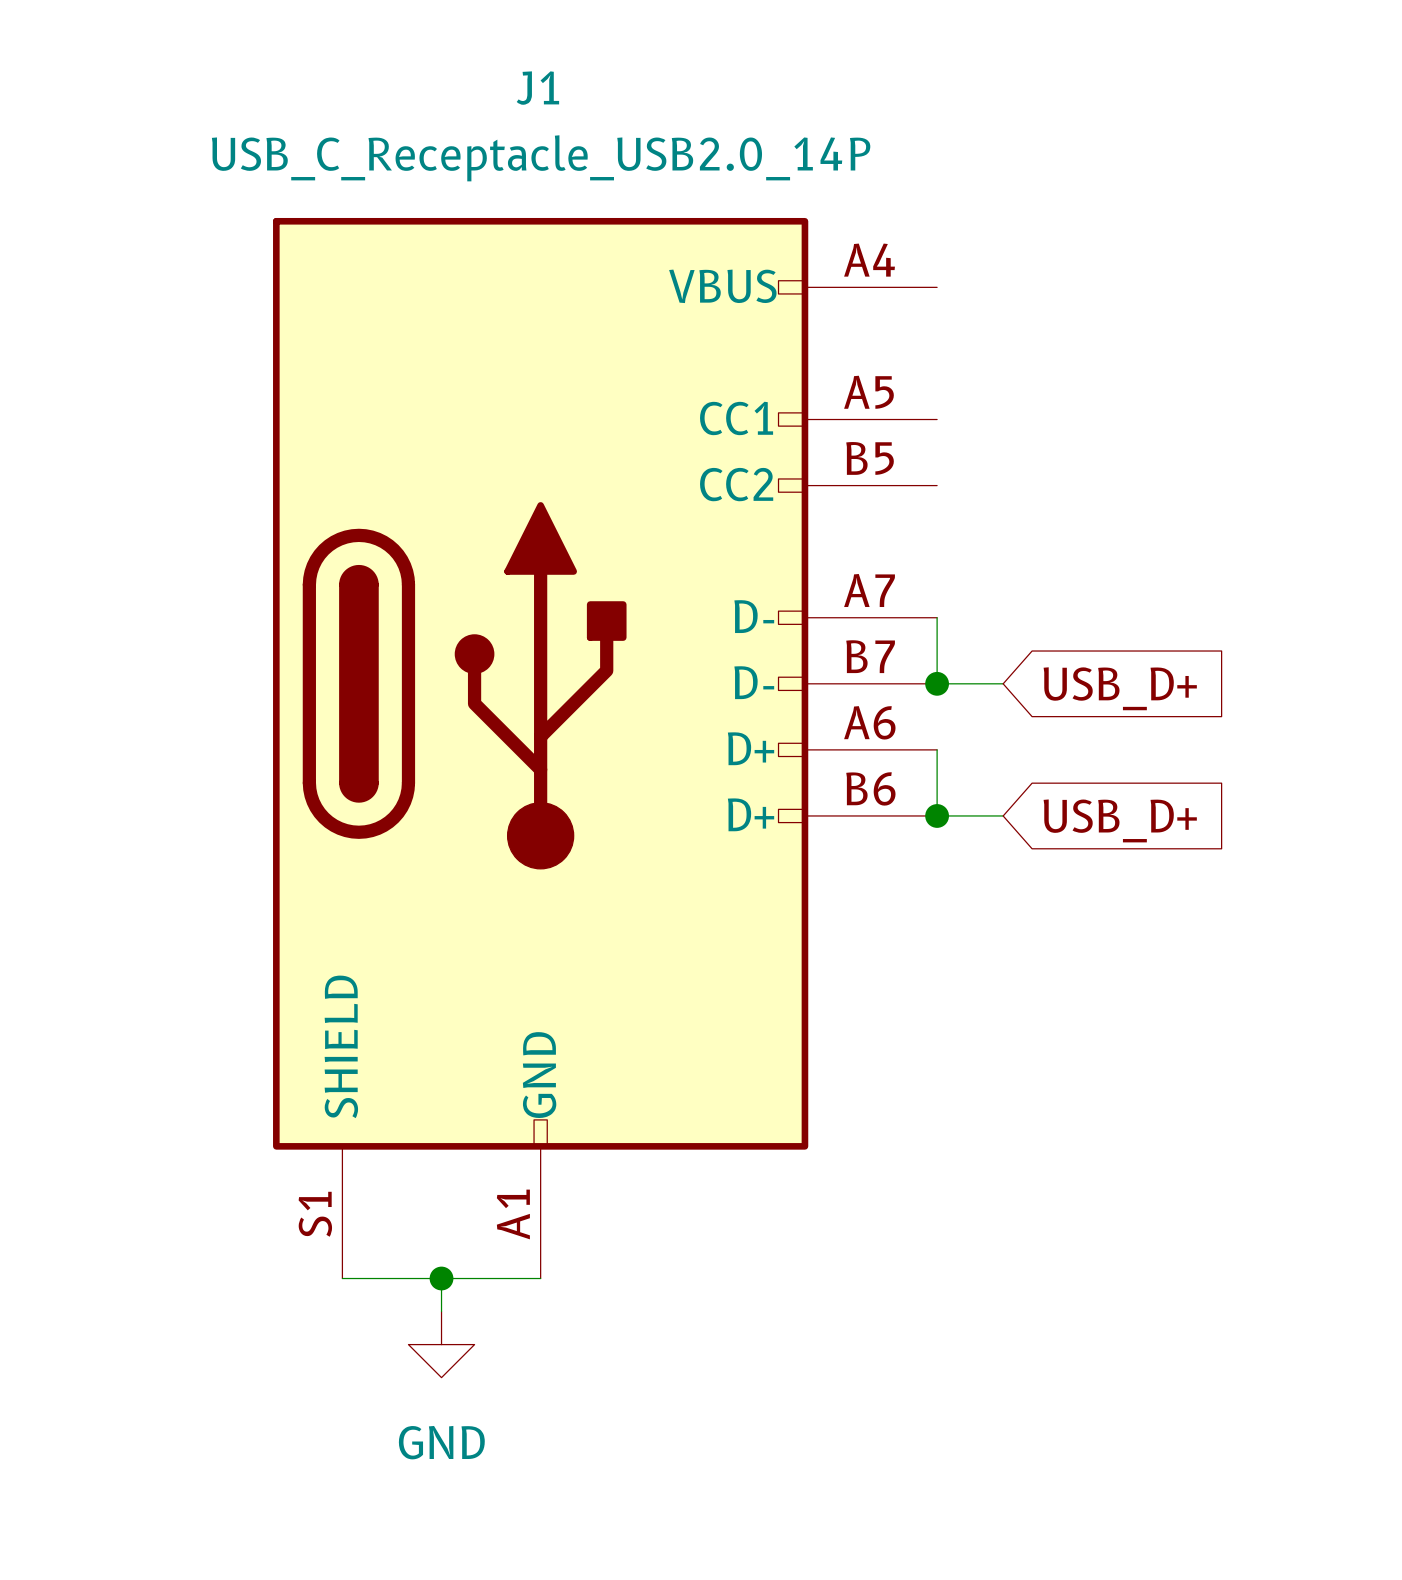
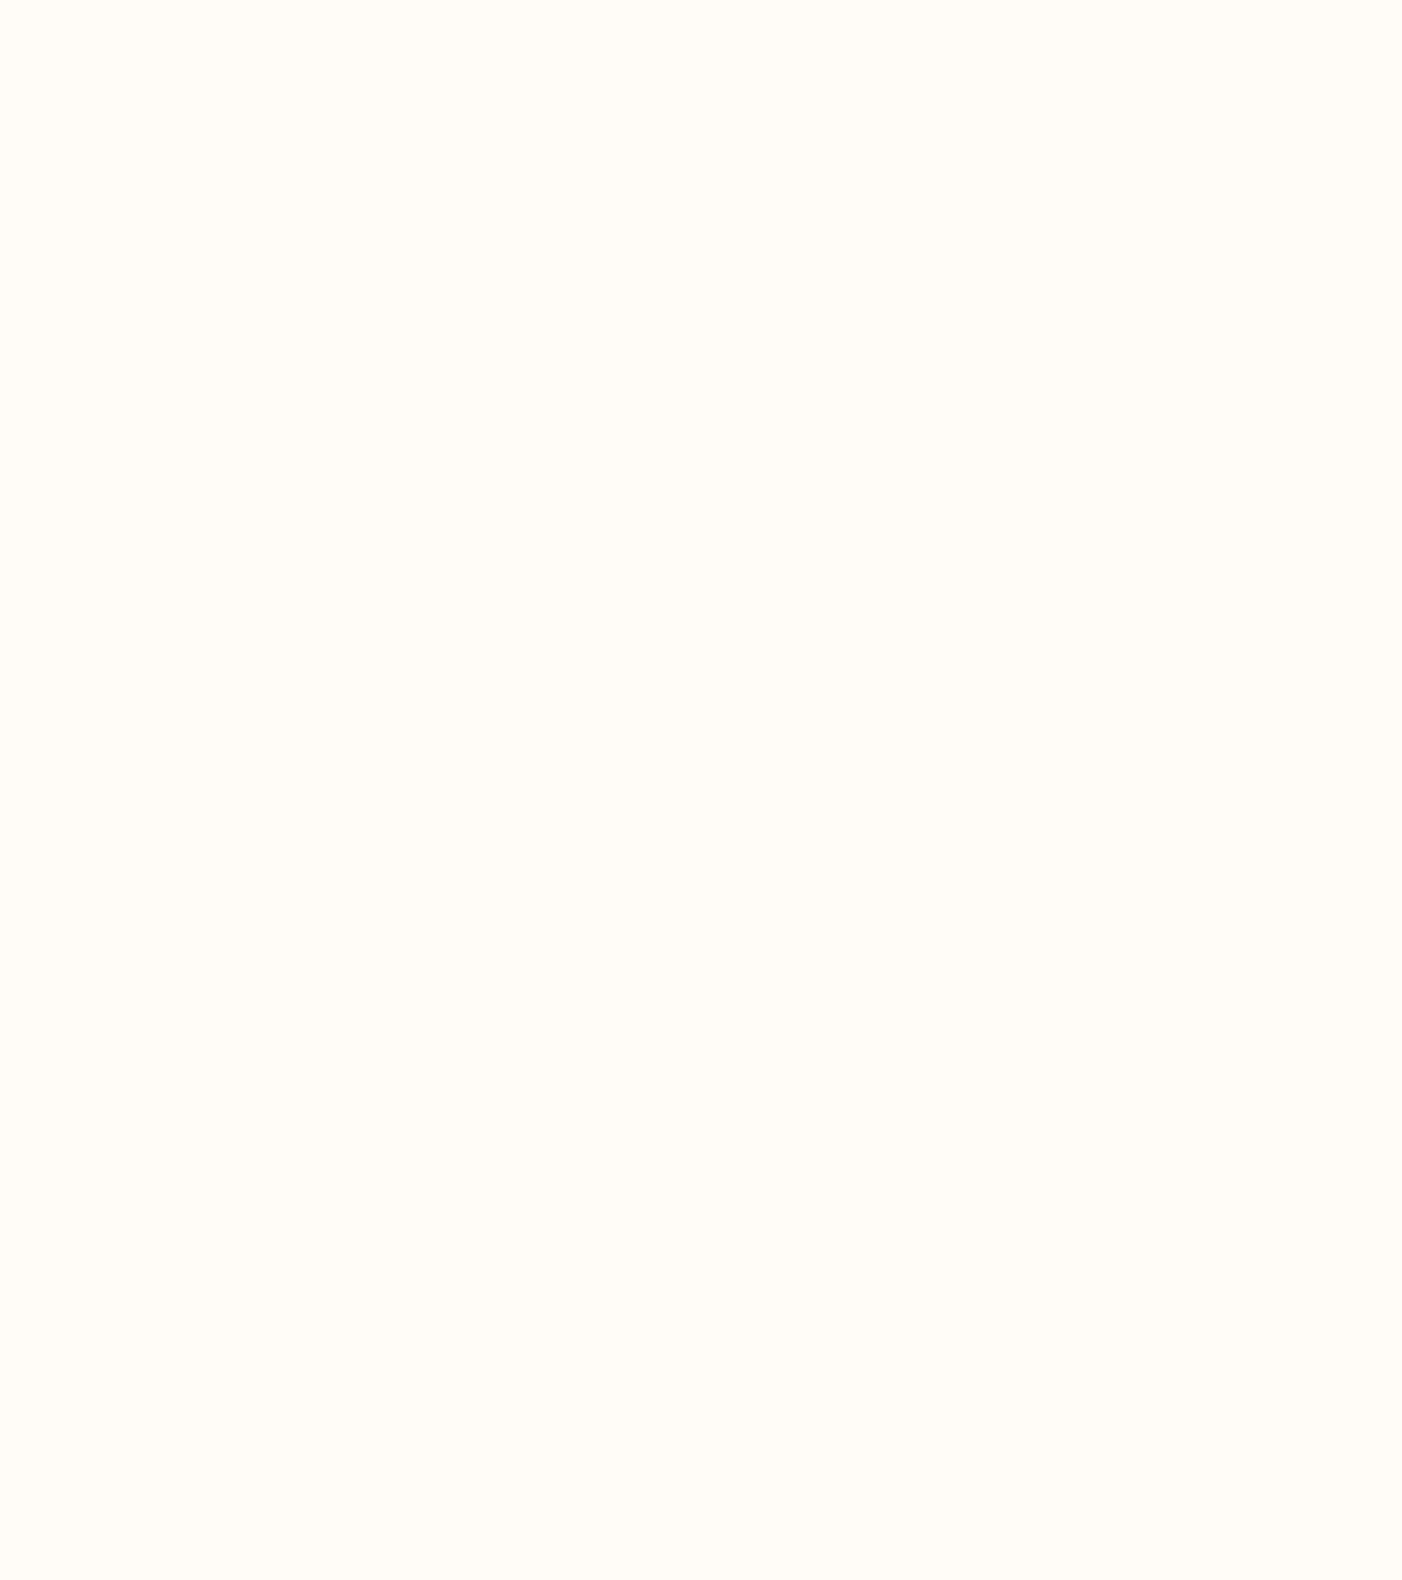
wire: (937, 617) (937, 683) (1003, 683) -> none
junction: (937, 683) -> none
global label: USB_D+ (1120, 688) -> none
J1: USB_C_Receptacle_USB2.0_14P (605, 748) -> none
wire: (937, 749) (937, 815) (1003, 815) -> none
junction: (937, 815) -> none
global label: USB_D+ (1120, 820) -> none
wire: (342, 1278) (540, 1278) -> none
wire: (441, 1278) (441, 1311) -> none
junction: (441, 1278) -> none
power symbol: GND (441, 1344) -> none

